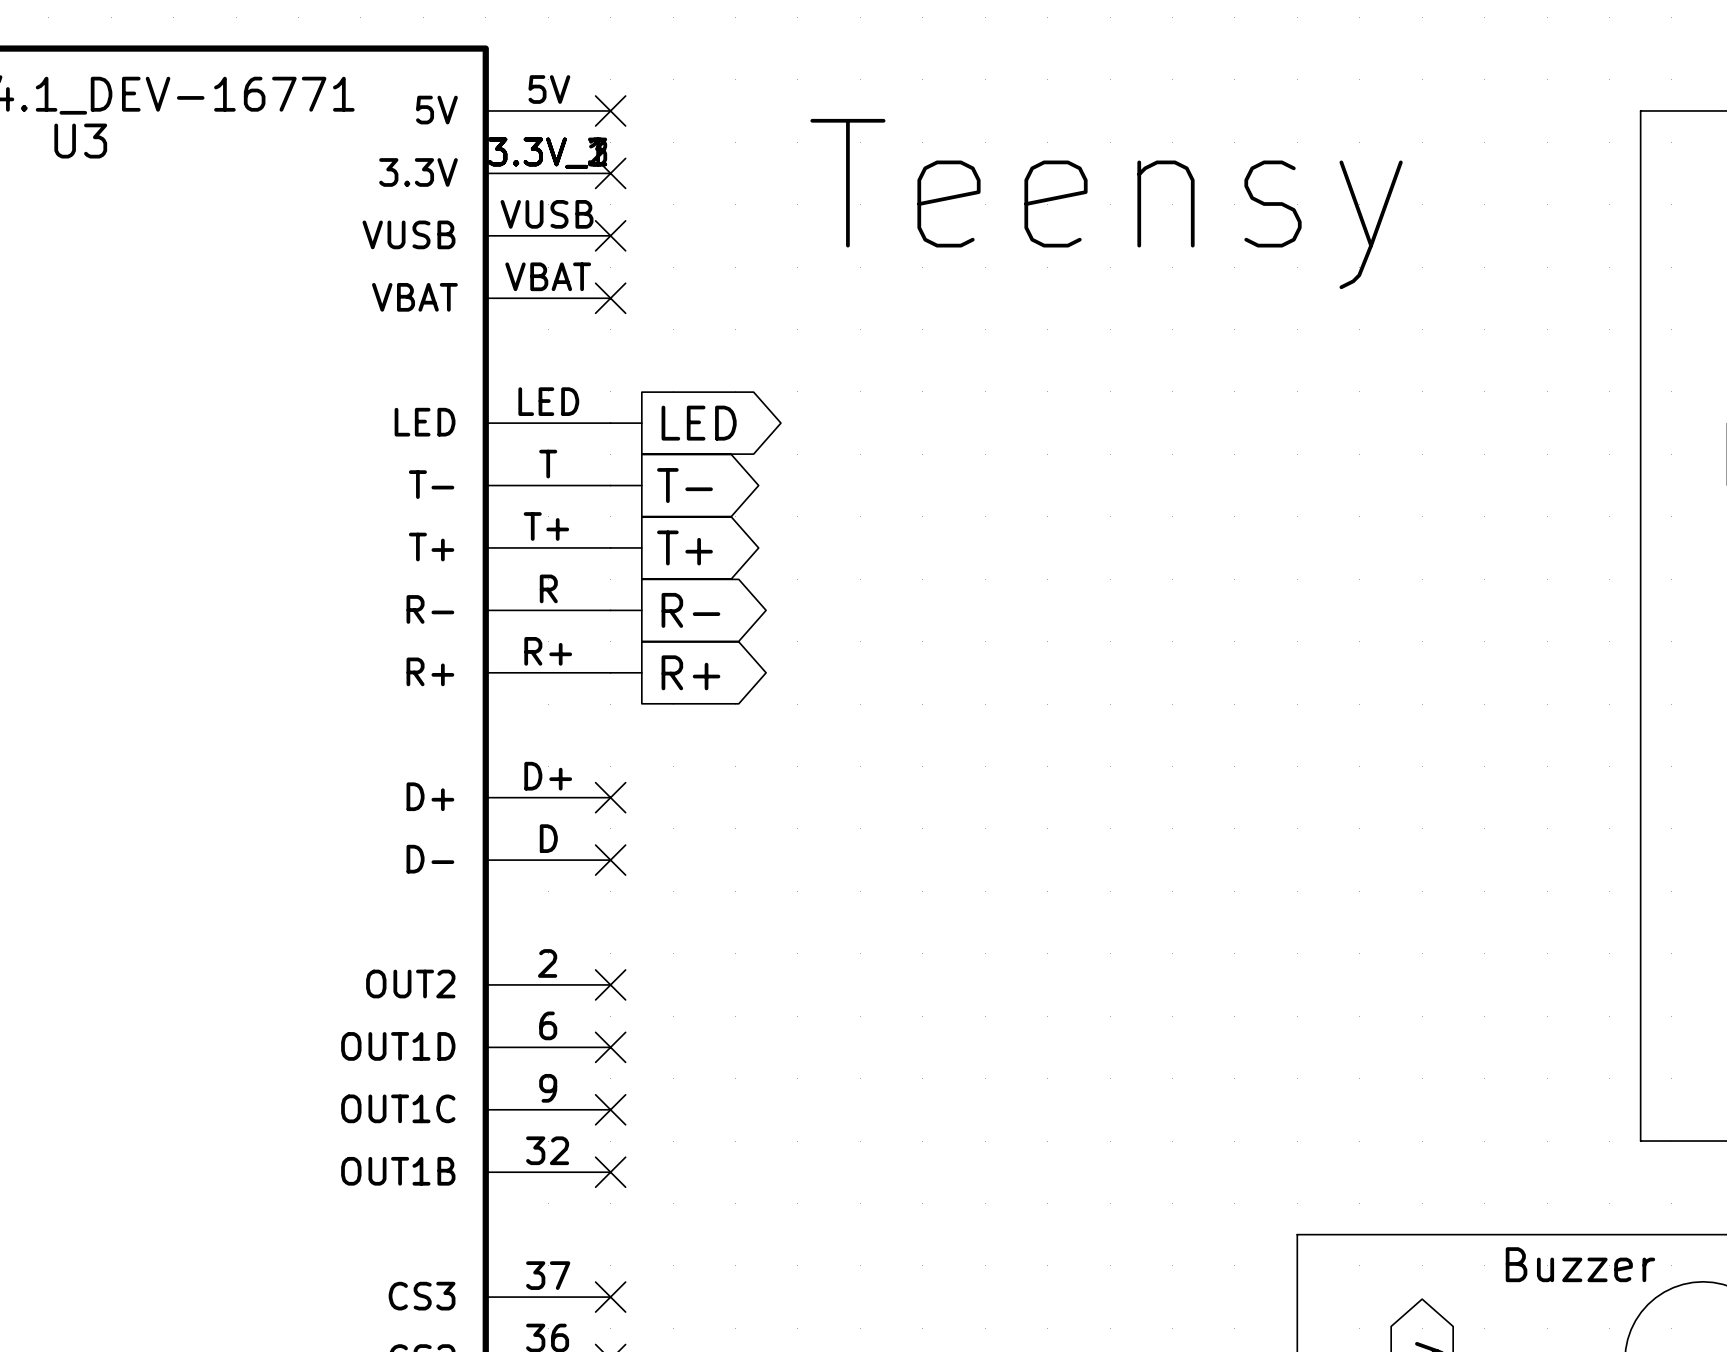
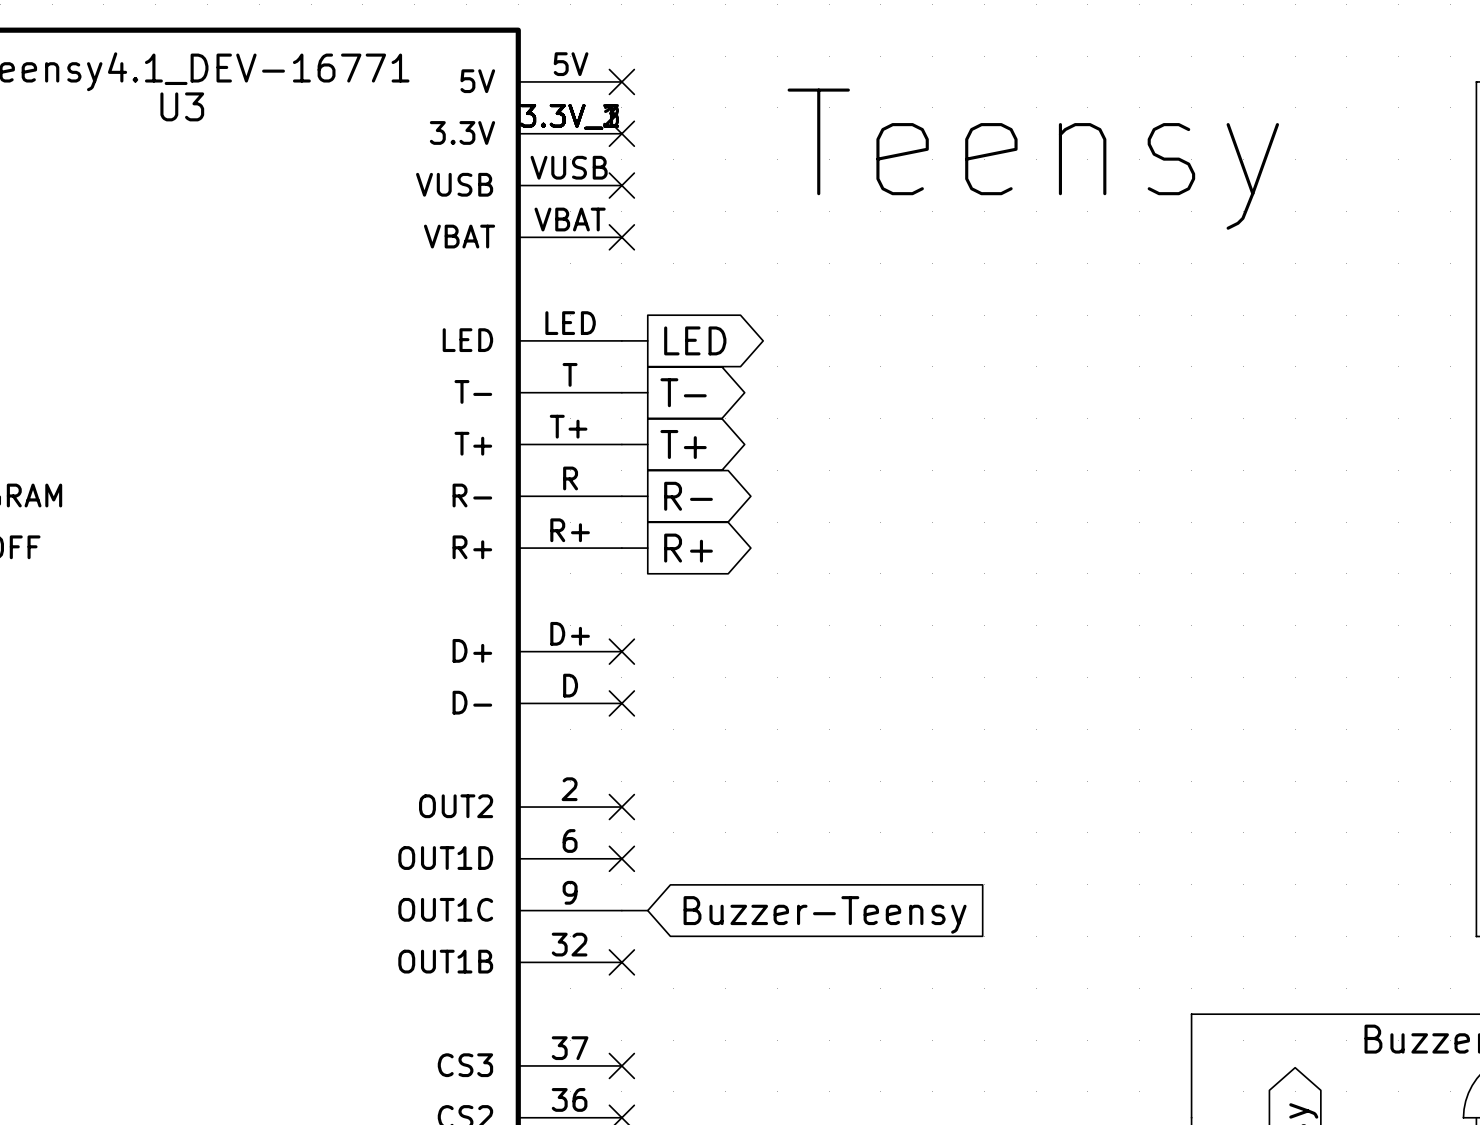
wire: none -> (621, 910) (647, 910)
no-connect mark: (610, 1109) -> none
global label: none -> Buzzer-Teensy (825, 914)

